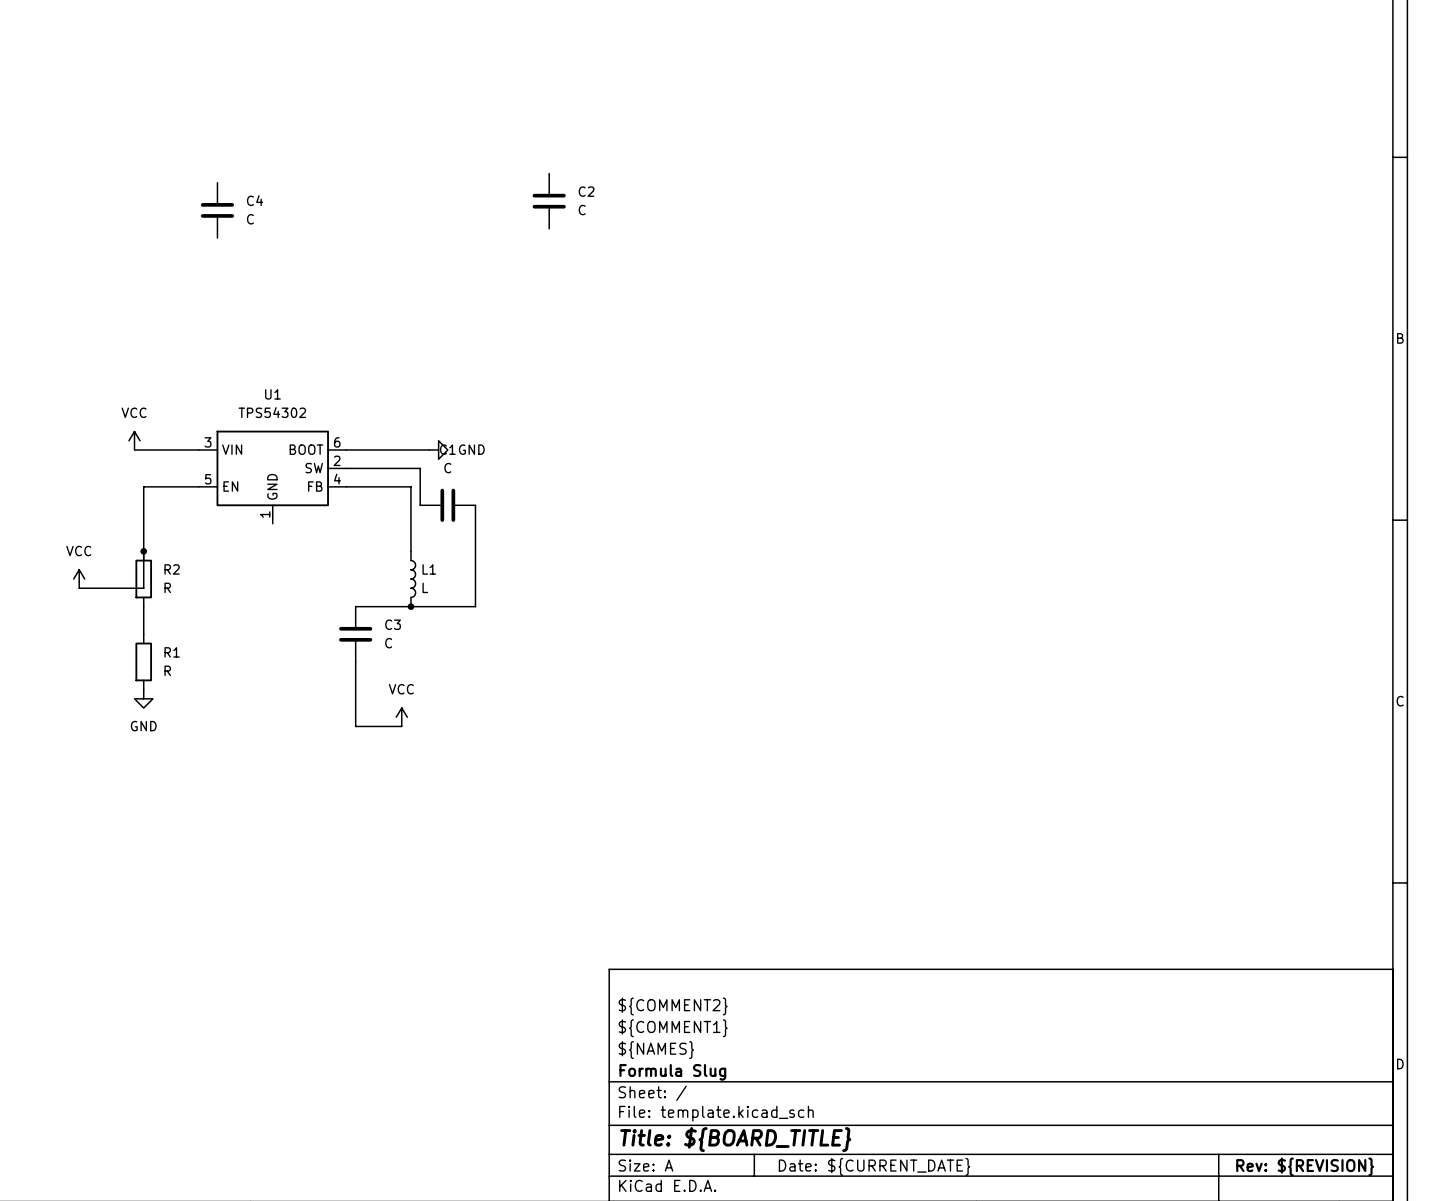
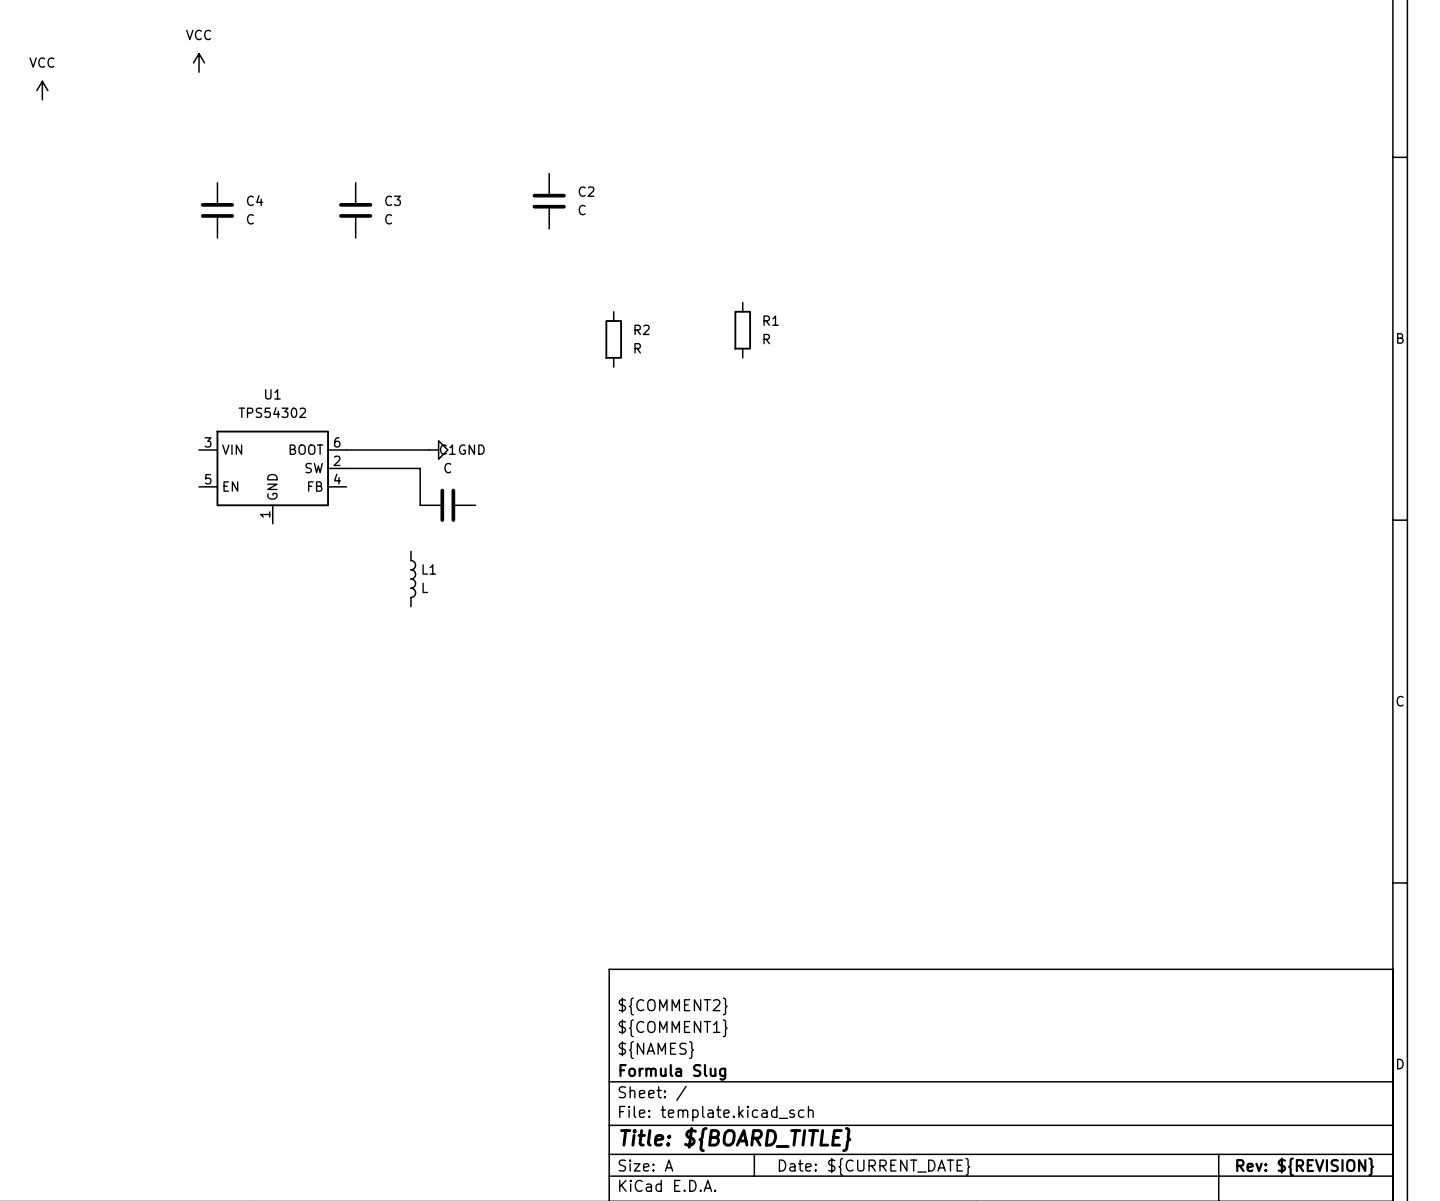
power symbol: none -> VCC (199, 62)
power symbol: none -> VCC (42, 90)
power symbol: VCC (134, 440) -> none
wire: (134, 450) (199, 450) -> none
wire: (199, 486) (143, 486) (143, 588) (79, 588) -> none
wire: (346, 486) (410, 486) (410, 551) -> none
wire: (475, 505) (475, 606) (355, 606) -> none
junction: (143, 551) -> none
power symbol: VCC (79, 579) -> none
R2 position: (143, 579) -> (613, 339)
wire: (143, 606) (143, 634) -> none
junction: (410, 606) -> none
C3 position: (355, 634) -> (355, 210)
R1 position: (143, 661) -> (742, 330)
wire: (355, 661) (355, 726) (401, 726) -> none
power symbol: GND (143, 698) -> none
power symbol: VCC (401, 717) -> none

